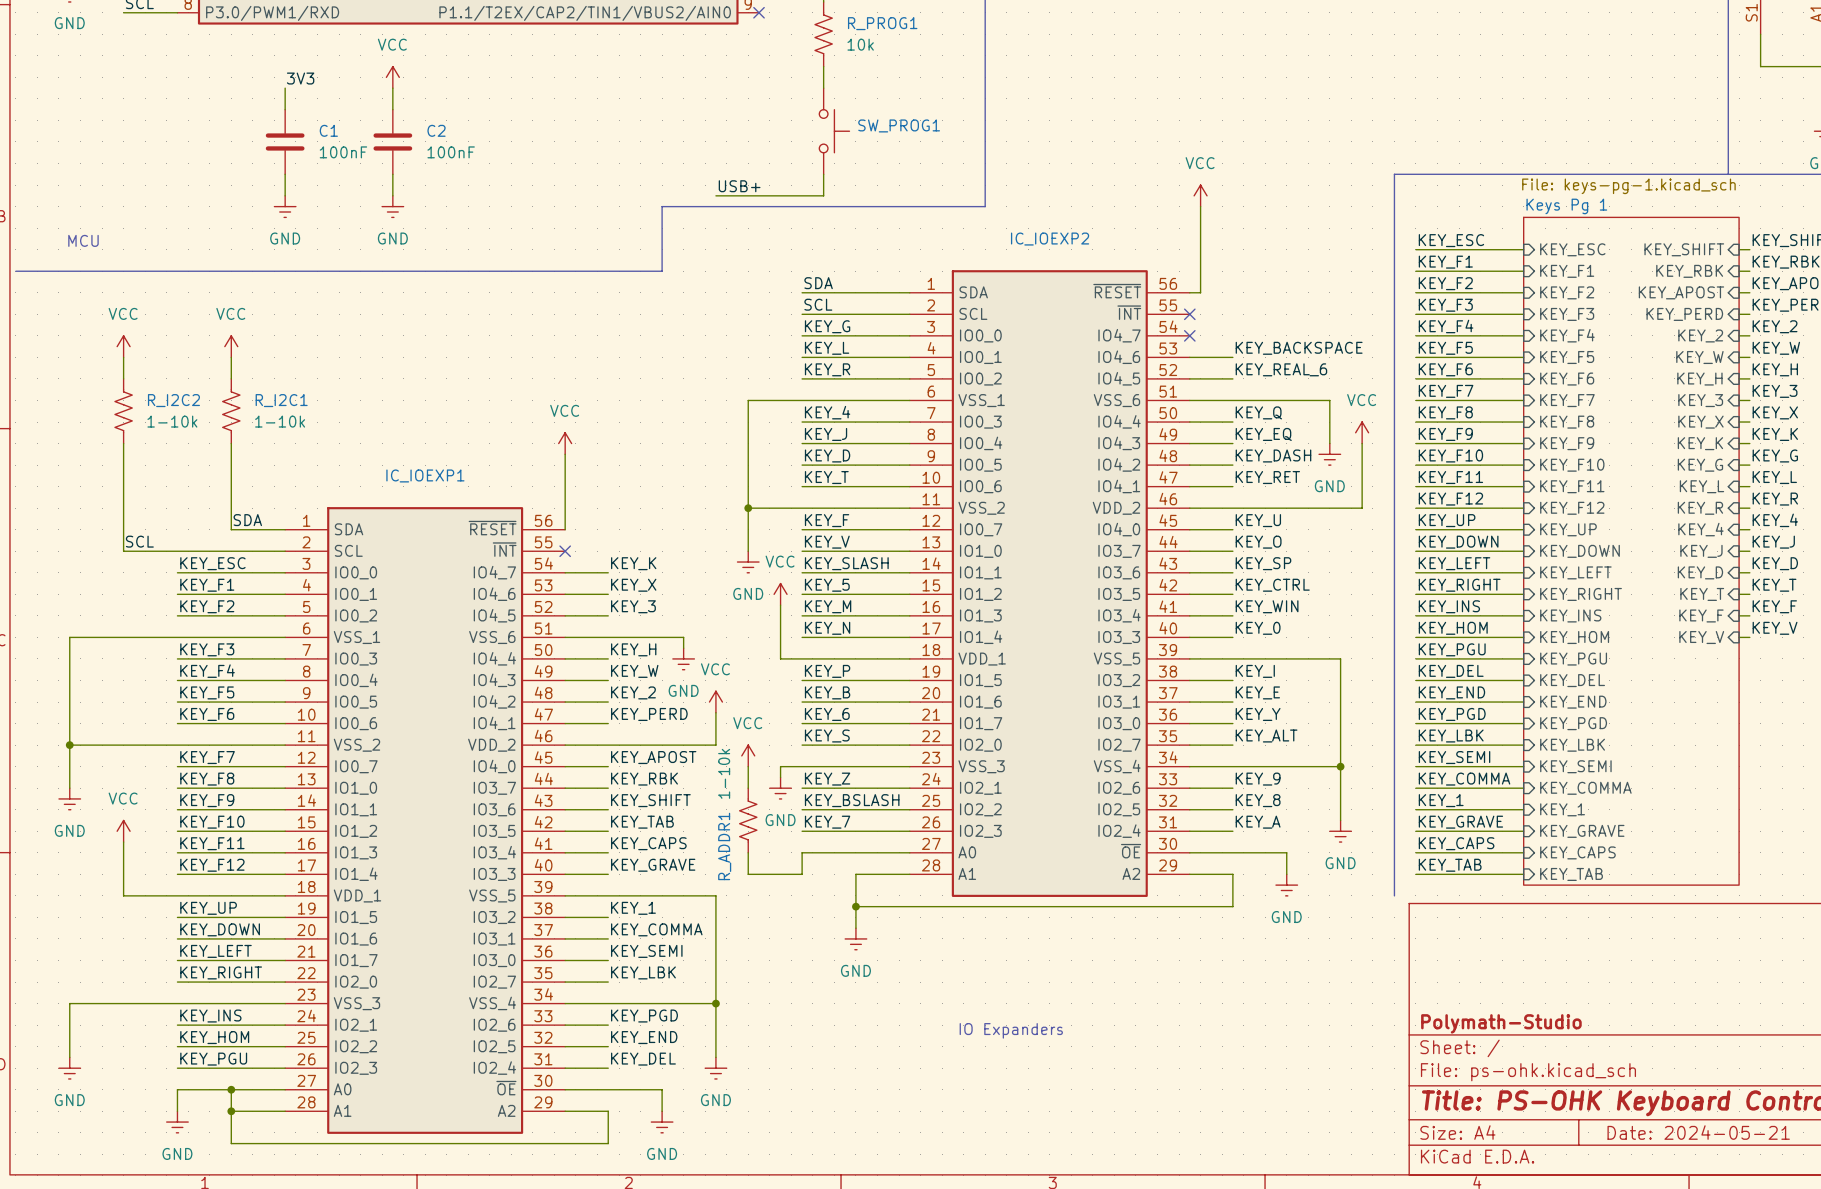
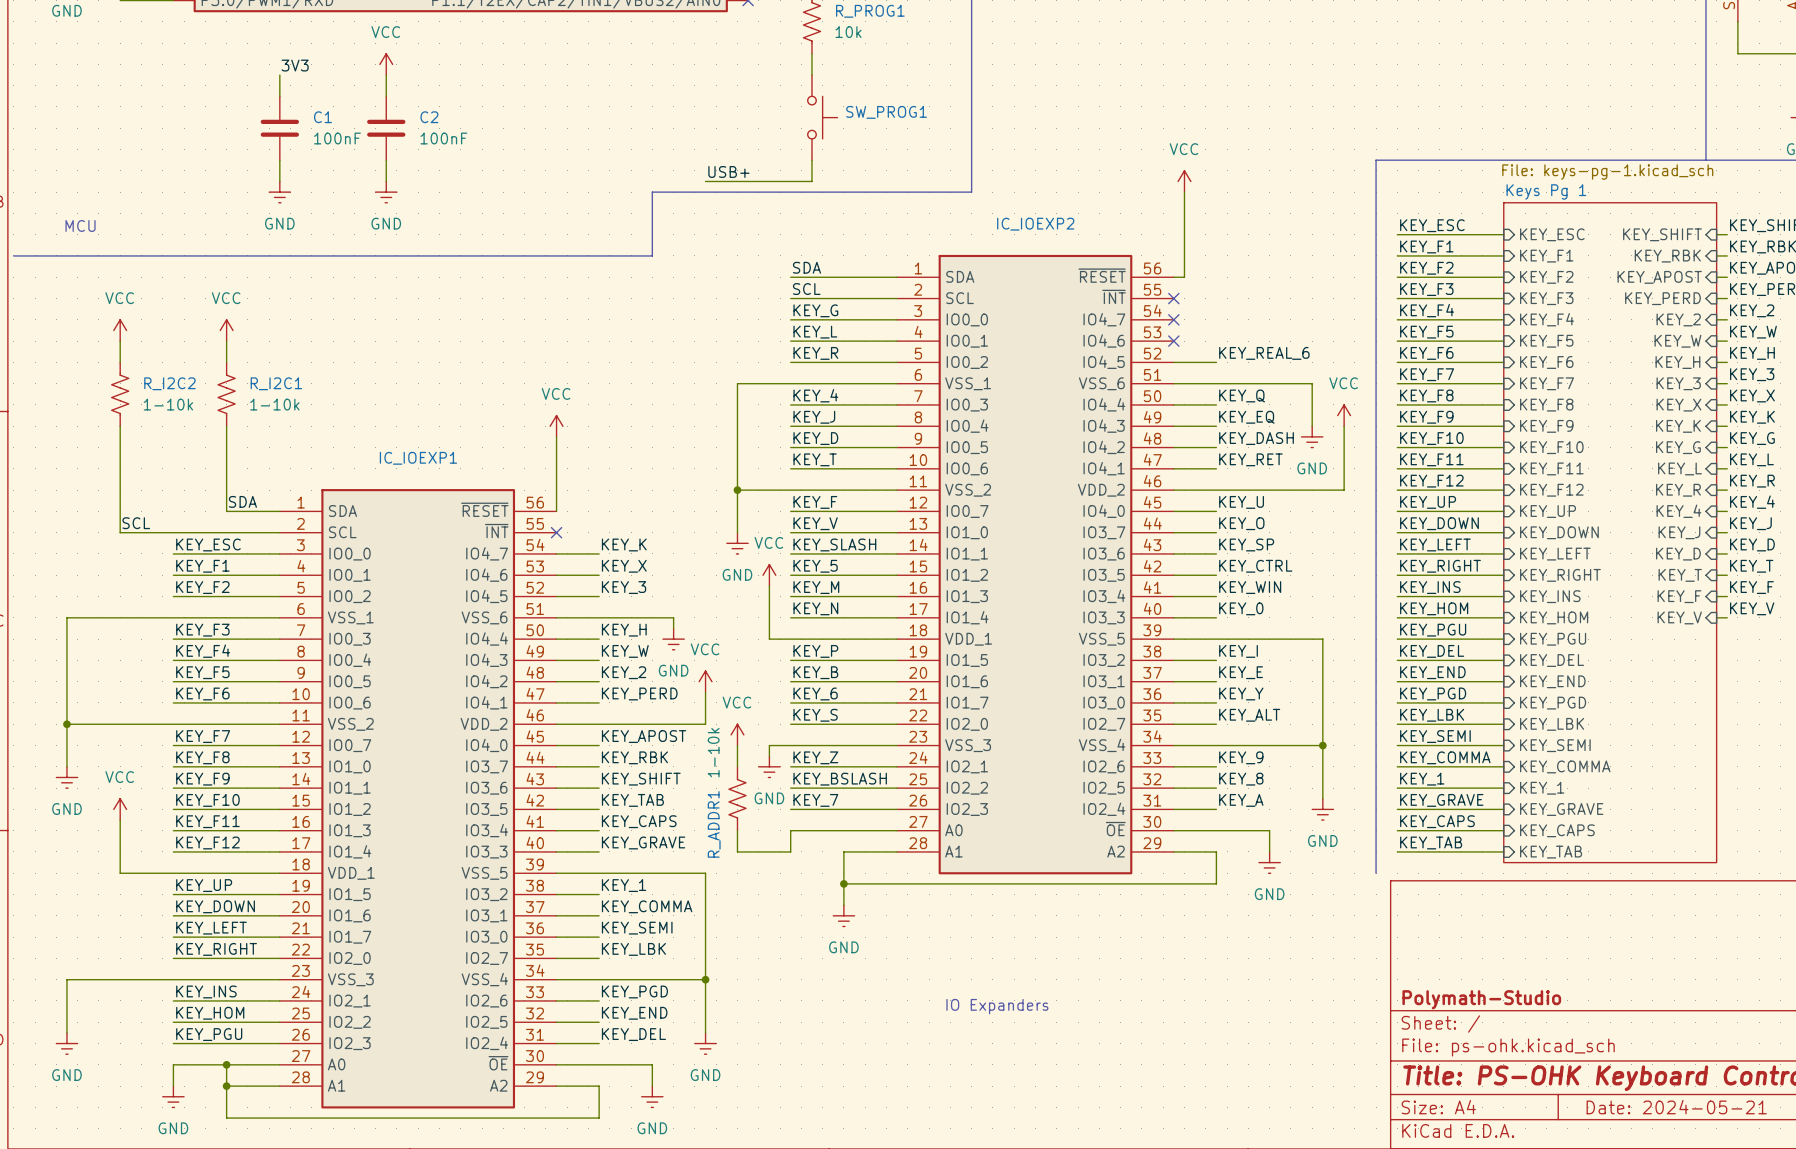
label: KEY_BACKSPACE (1299, 348) -> none
wire: (1189, 357) (1232, 357) -> none
no-connect mark: none -> (1173, 341)

